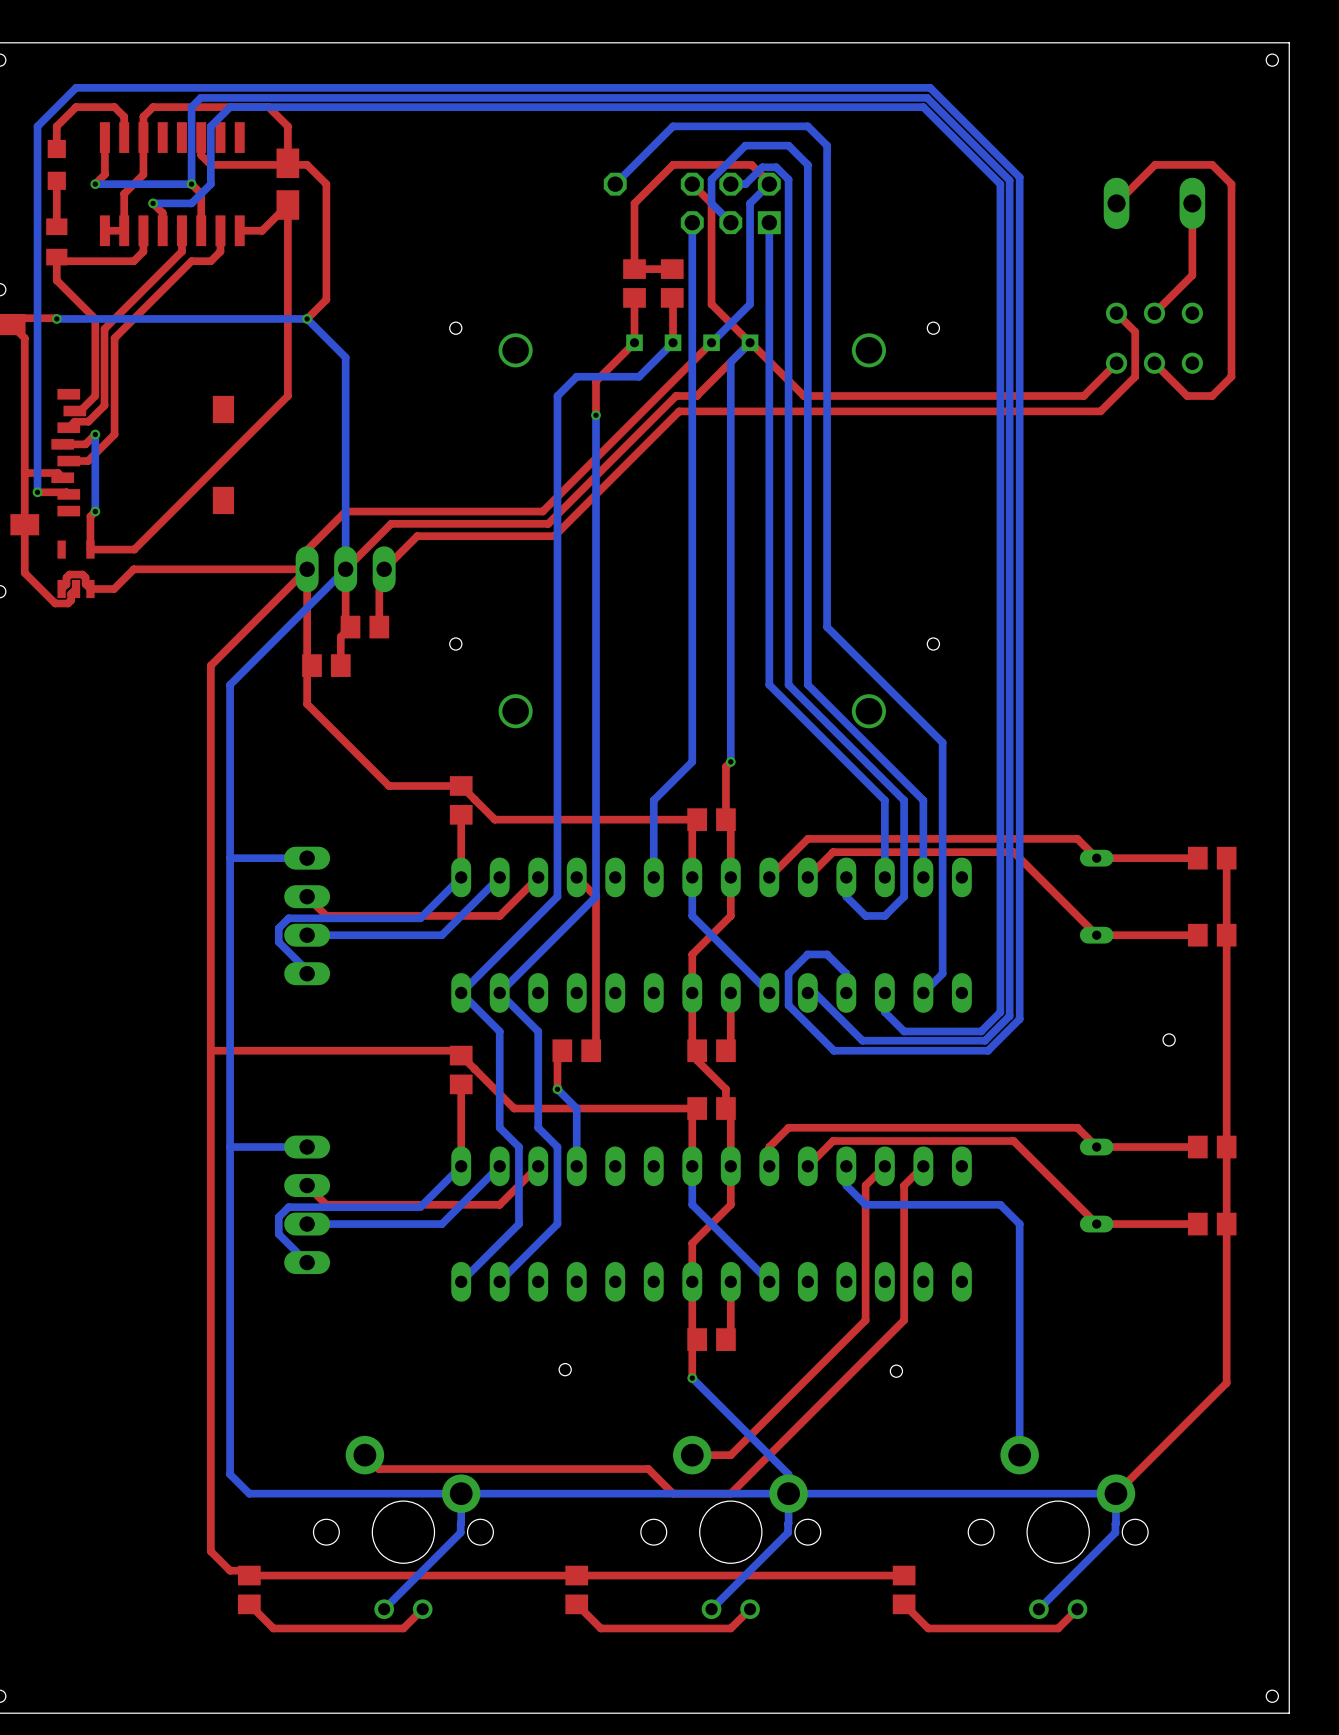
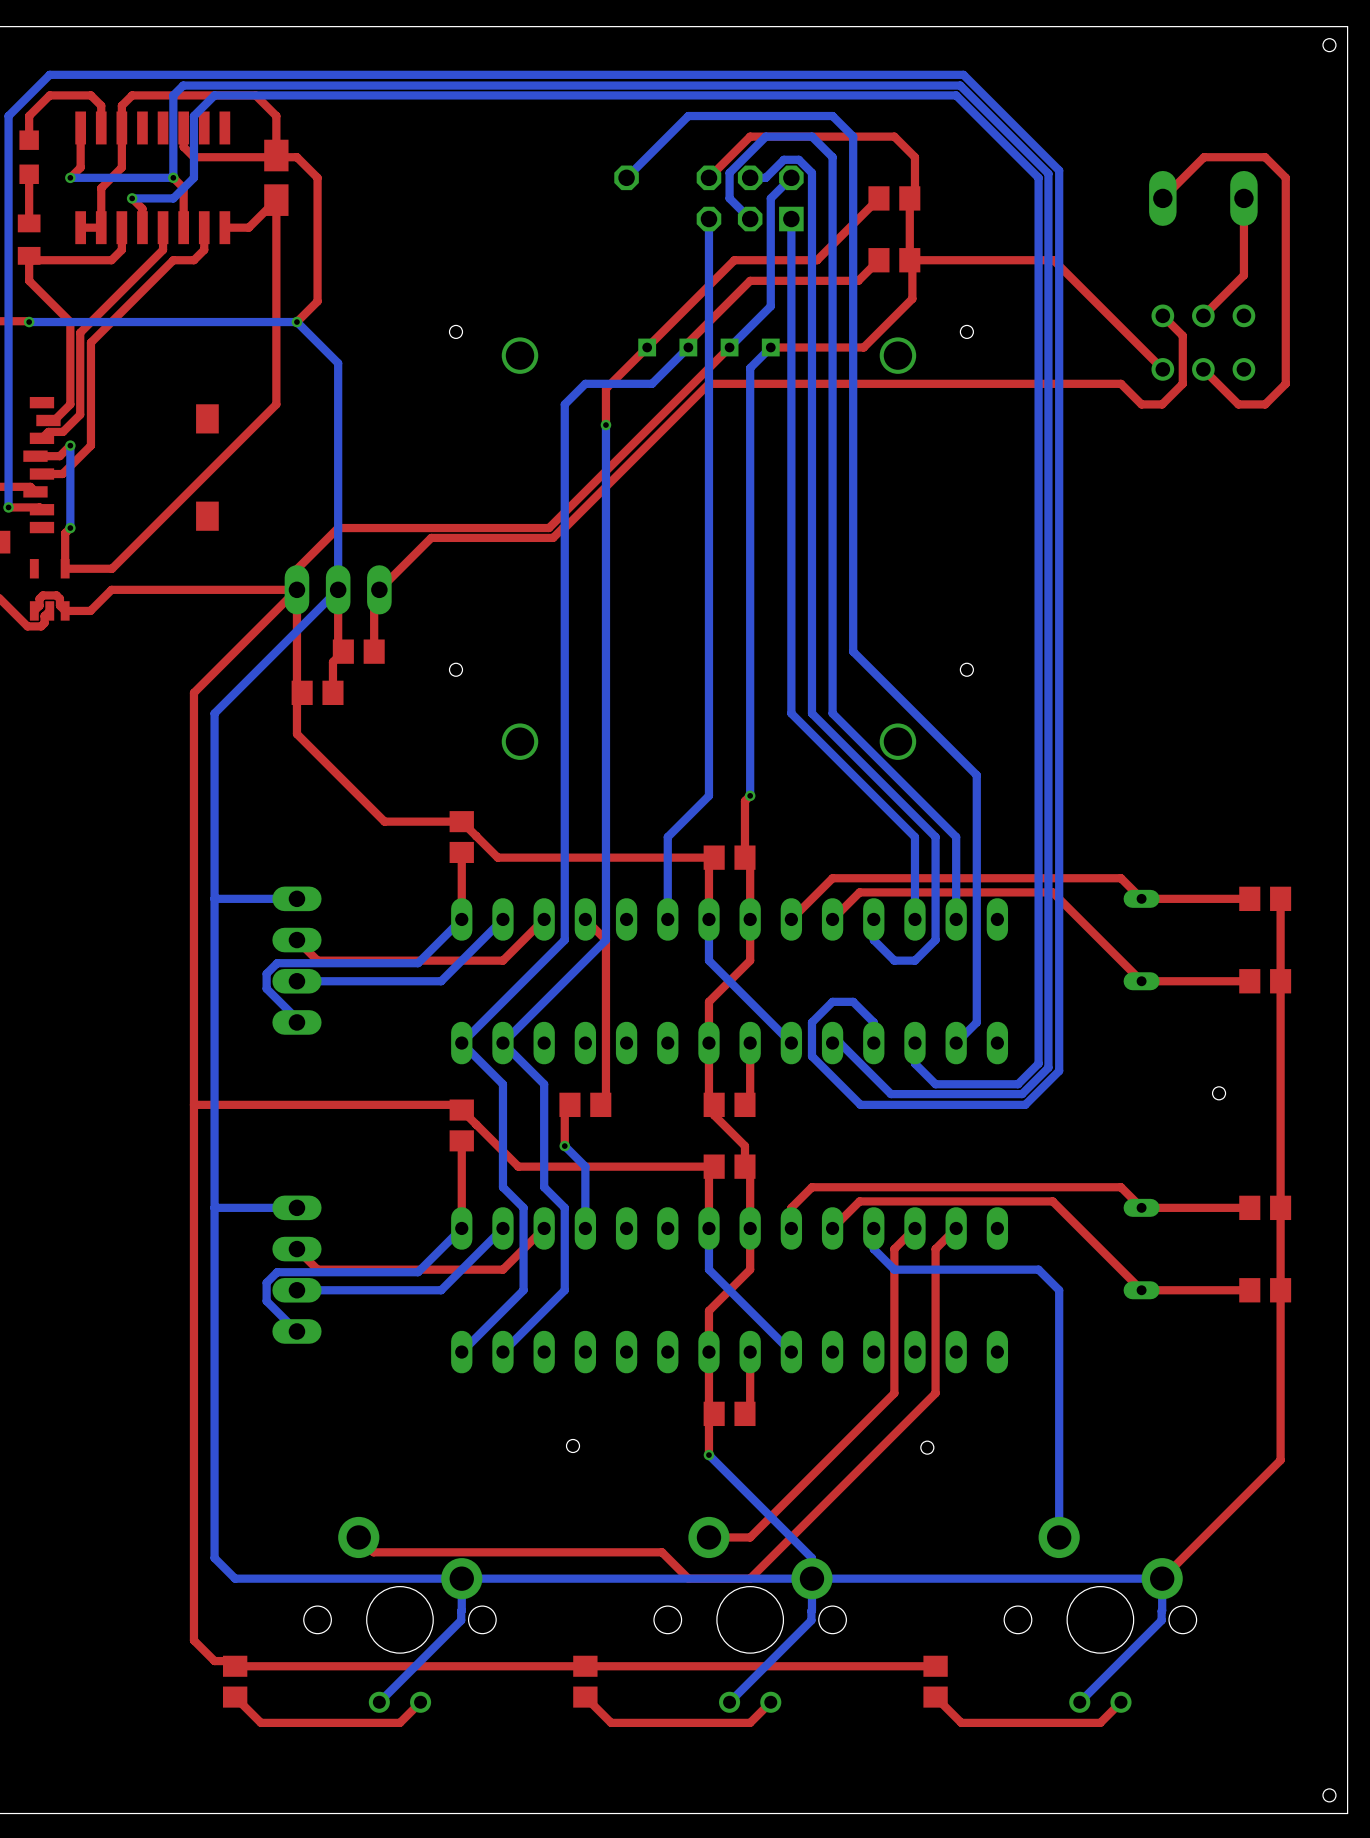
top track: (692, 184) (711, 203) (711, 304) (750, 342) (696, 395) (676, 395) (548, 523) (391, 523) (345, 569) -> (708, 177) (750, 136) (894, 136) (914, 157) (914, 193) (909, 198) (909, 260)
top track: (769, 184) (751, 164) (673, 164) (634, 203) (634, 269) (672, 269) -> none
part: none -> (894, 198)
part: none -> (894, 260)
top track: none -> (909, 260) (912, 262) (912, 298) (863, 347) (771, 347)
part: (634, 283) -> none
part: (672, 283) -> none
top track: (634, 297) (634, 342) -> (878, 198) (817, 260) (734, 260) (647, 347)
top track: (672, 297) (673, 338) -> (878, 260) (858, 280) (750, 280) (688, 342)
top track: (750, 342) (803, 395) (1083, 395) (1116, 363) -> (909, 260) (1053, 260) (1162, 369)
top track: (1115, 395) (1100, 411) (679, 411) (554, 536) (417, 536) -> (1162, 404) (1141, 404) (1120, 383) (708, 383) (553, 537) (431, 537) (414, 554)

